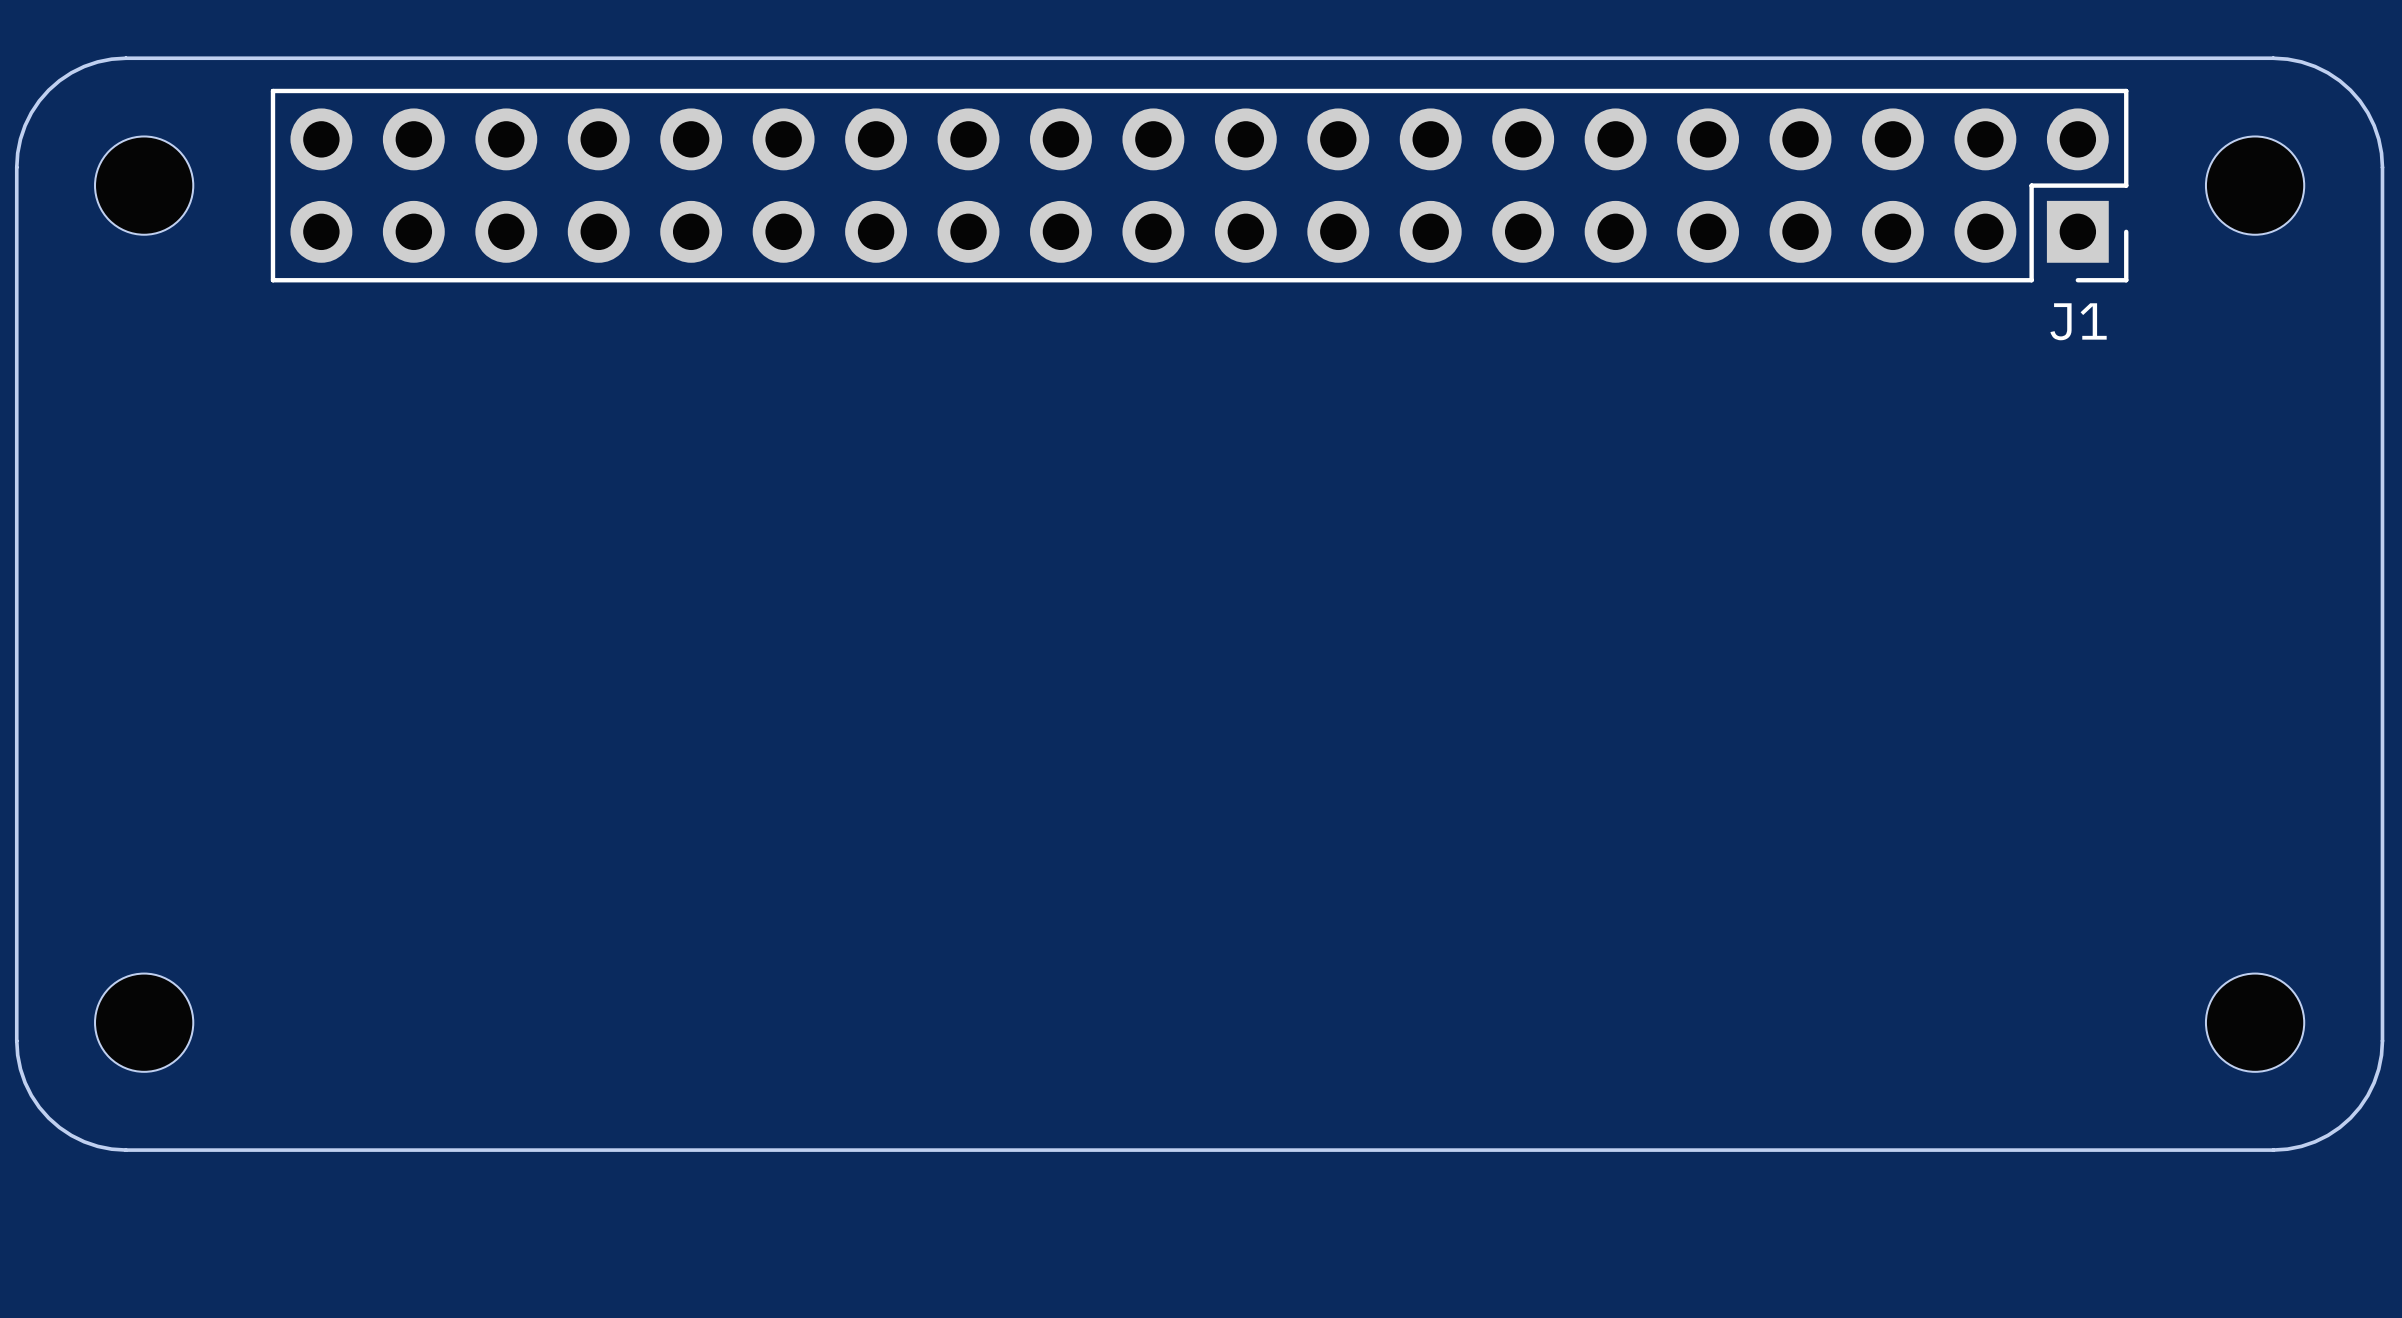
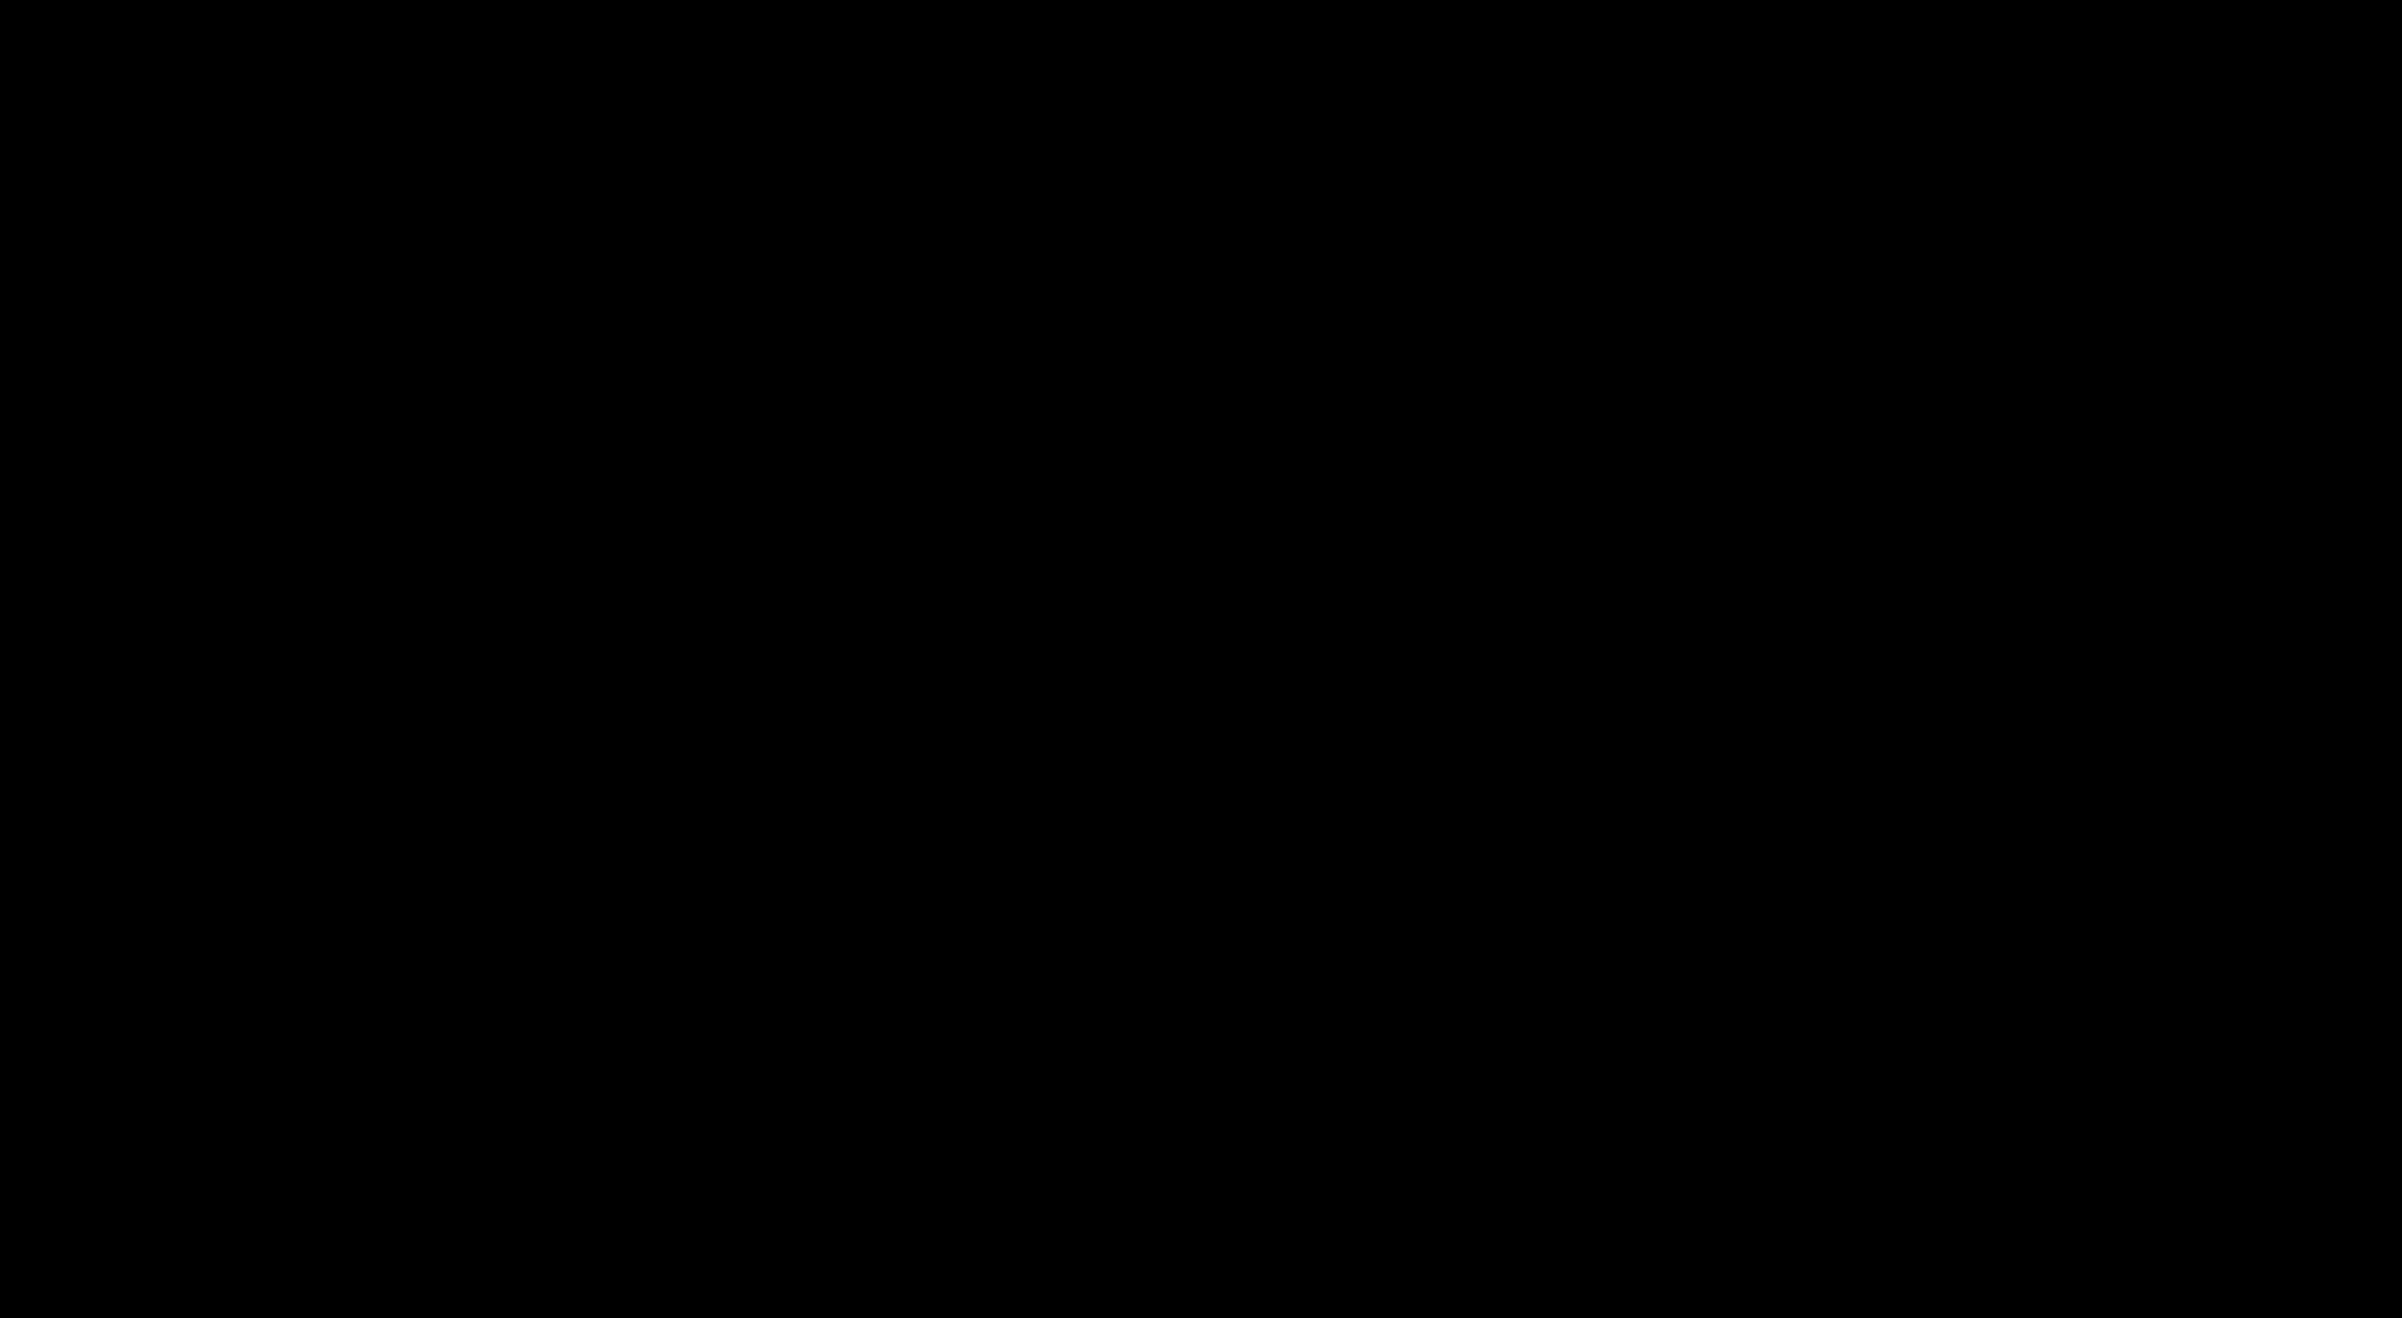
board edge: (2273, 58) (125, 58) (111, 59) (84, 66) (59, 80) (39, 100) (25, 125) (20, 139) (16, 167) (16, 1040) (17, 1055) (25, 1082) (39, 1107) (59, 1127) (71, 1135) (97, 1146) (125, 1150) (2273, 1150) (2301, 1146) (2315, 1141) (2339, 1127) (2359, 1107) (2374, 1082) (2381, 1055) (2382, 167) (2381, 153) (2374, 125) (2367, 112) (2350, 90) (2339, 80) (2315, 66) (2301, 61) (2273, 58) -> none
part: (144, 185) -> none
J1: (1199, 185) -> none
part: (2255, 185) -> none
part: (144, 1022) -> none
part: (2255, 1022) -> none

